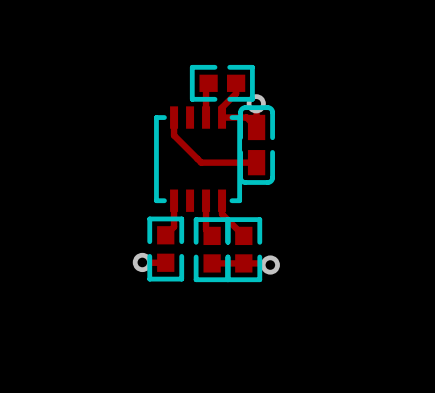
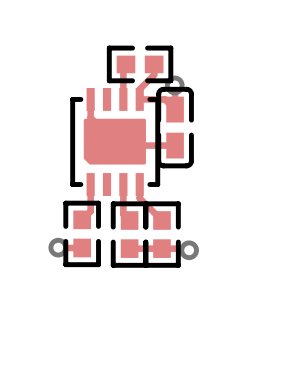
part footprint: [152, 106, 243, 215] -> [69, 88, 161, 199]

